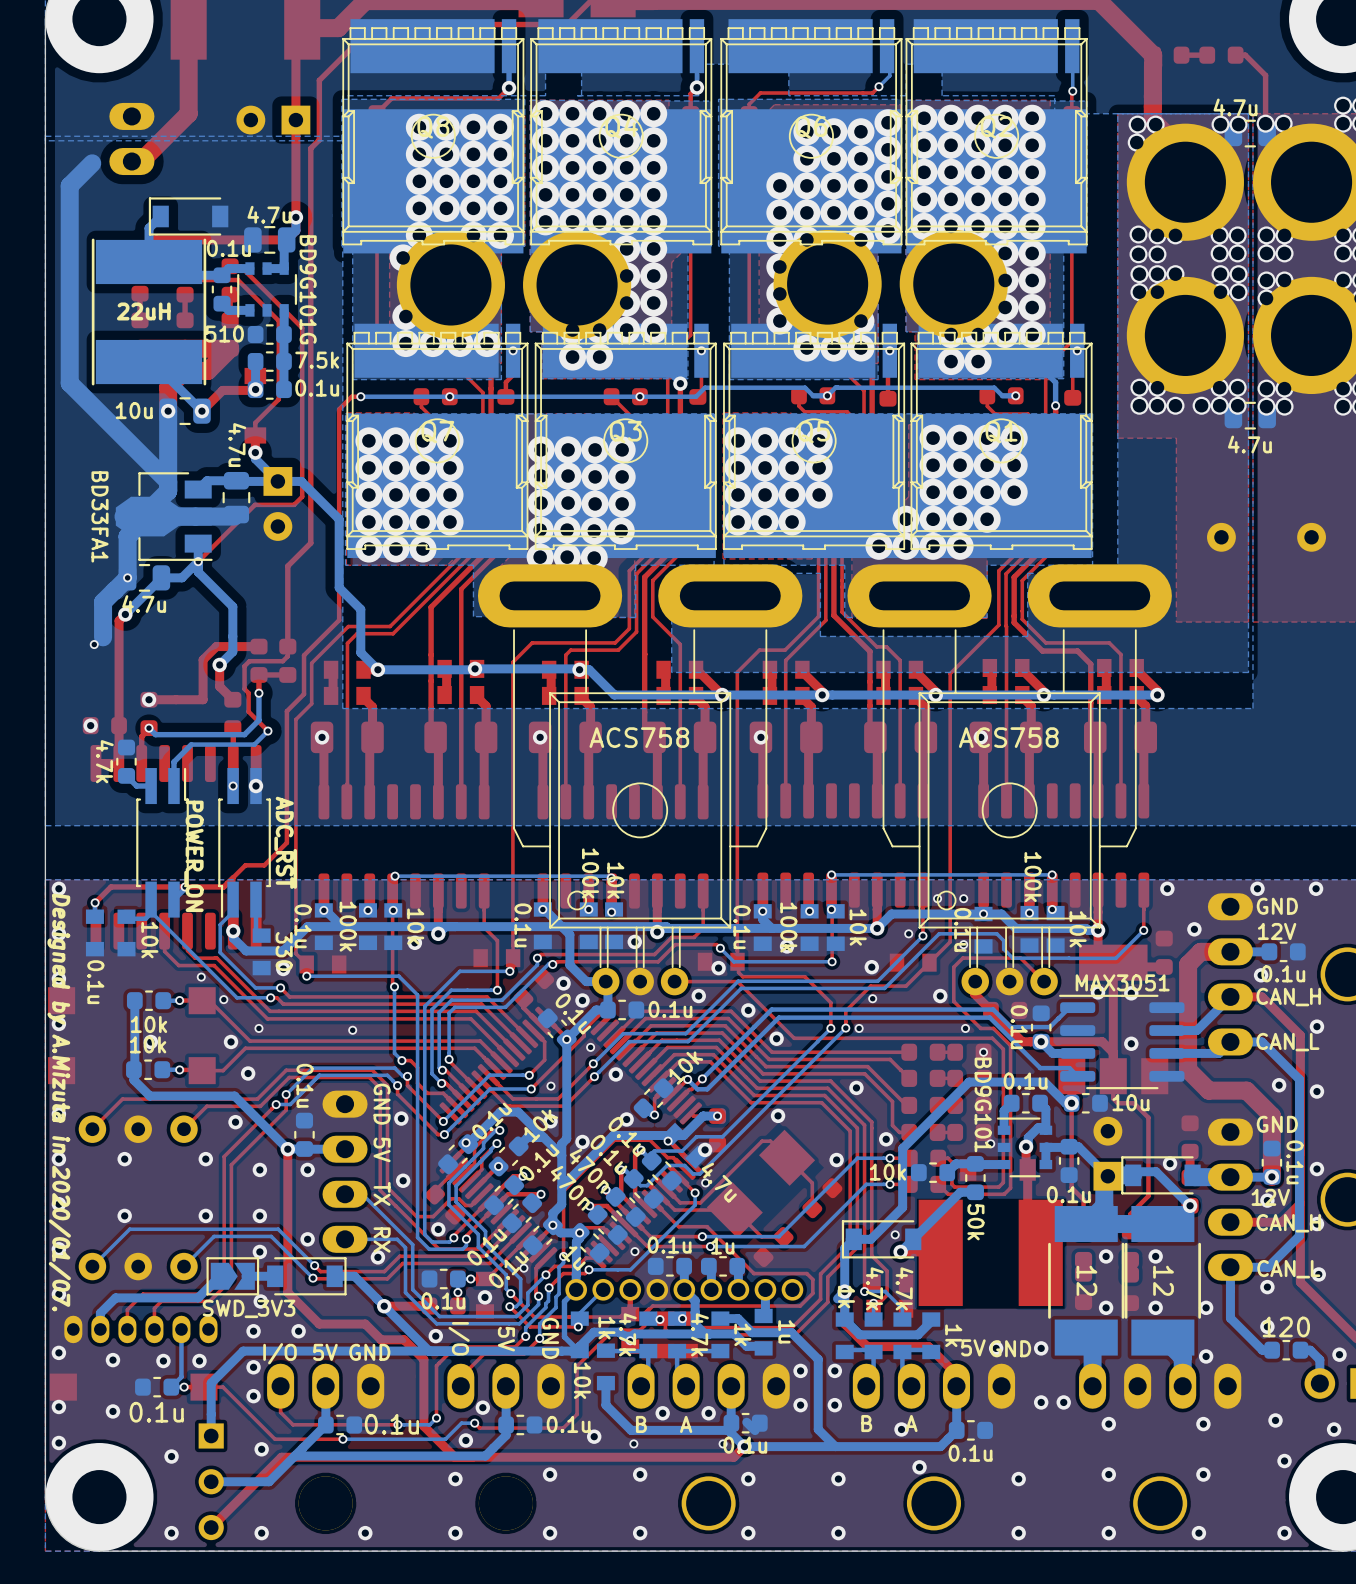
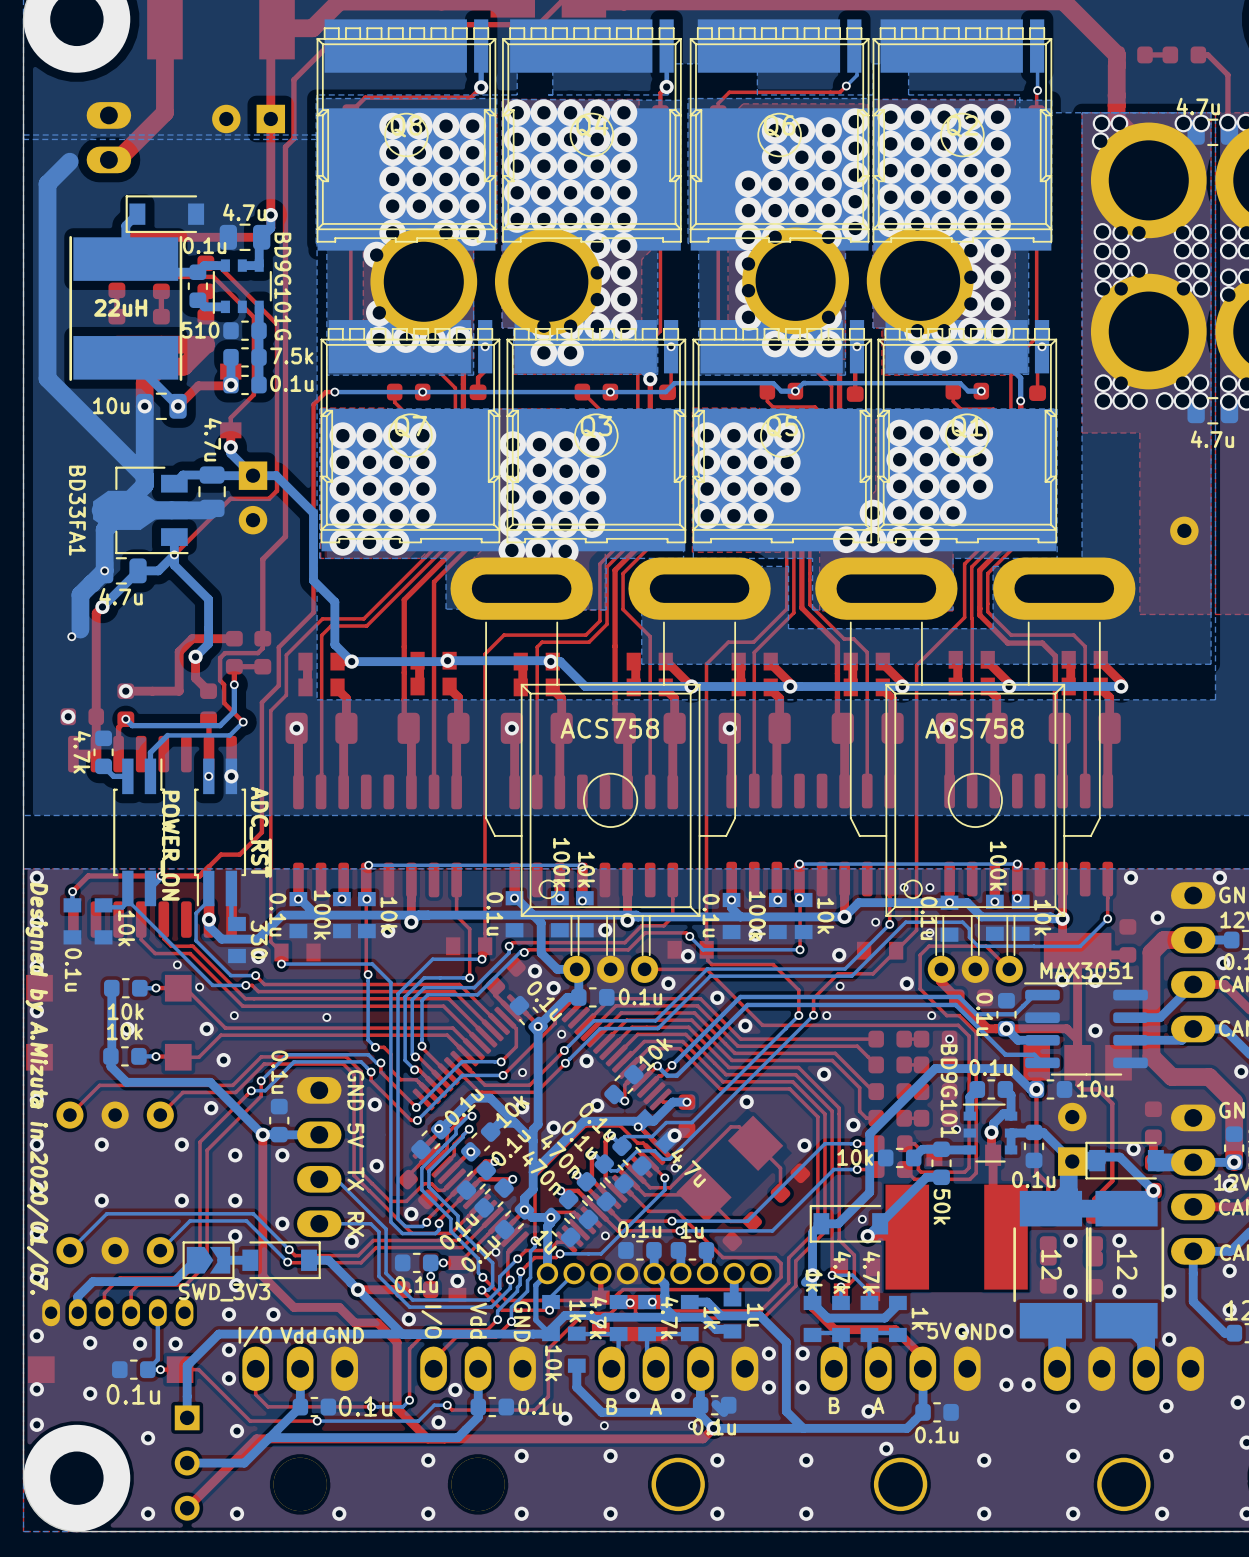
text: 5V (506, 1339) -> Vdd (478, 1320)
text: 5V (325, 1352) -> Vdd (298, 1335)

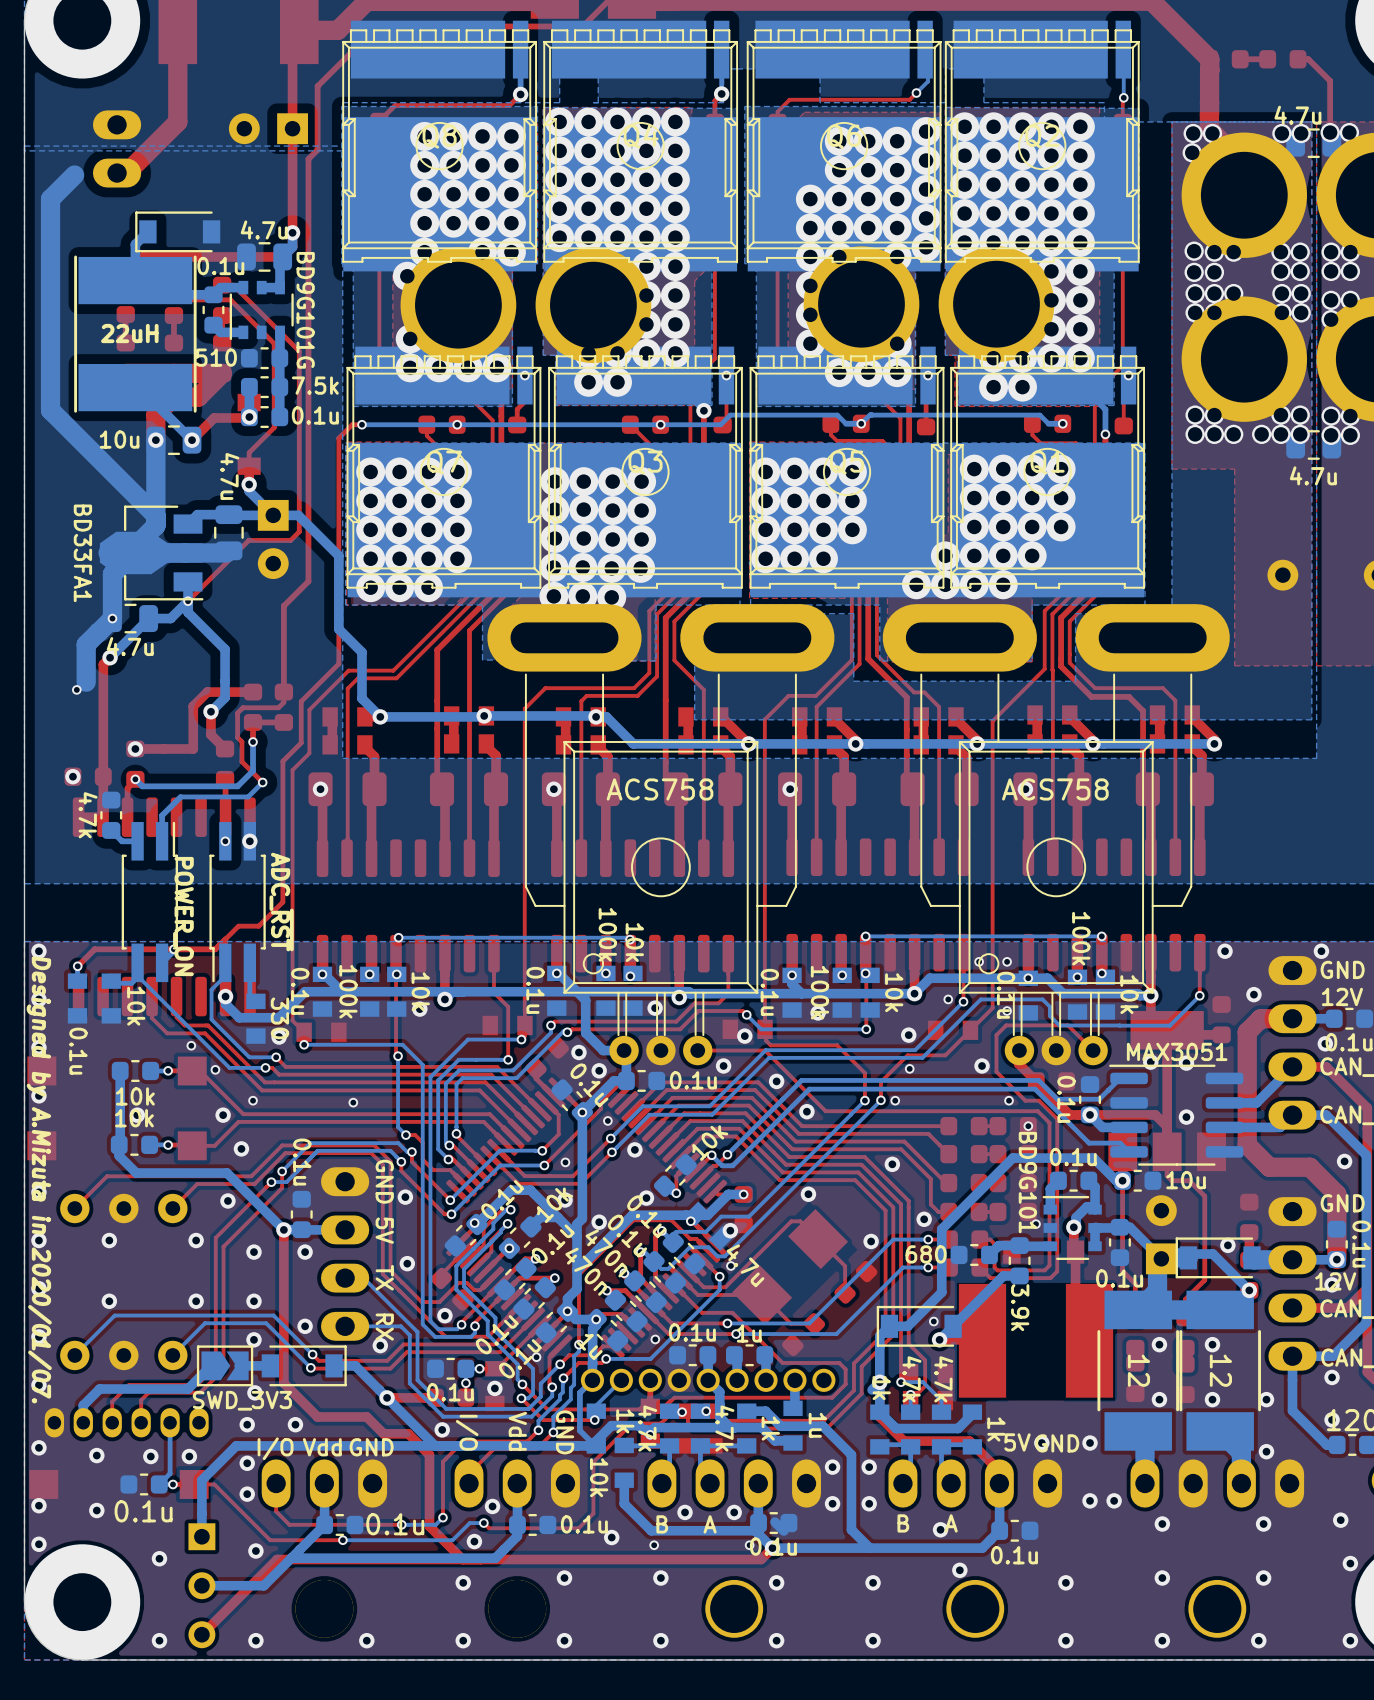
part value: 10k (855, 1157) -> 680 (926, 1254)
part value: 50k (942, 1206) -> 3.9k (1020, 1307)

